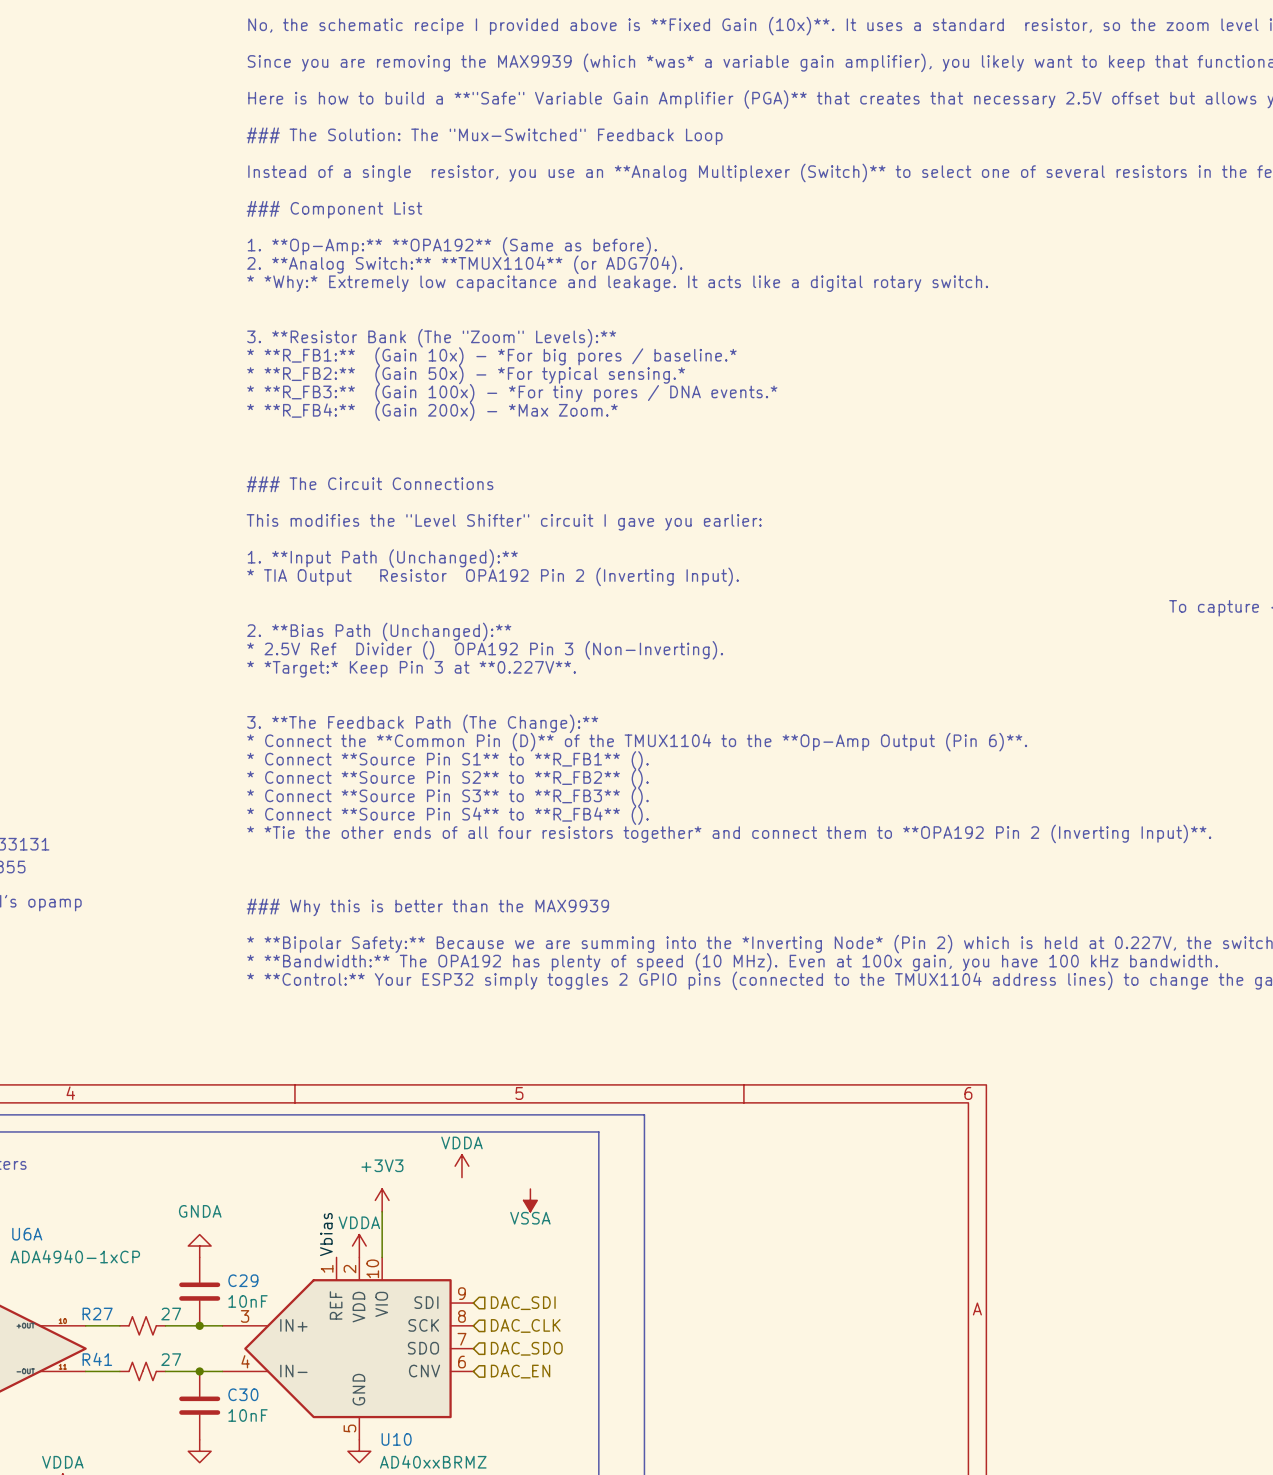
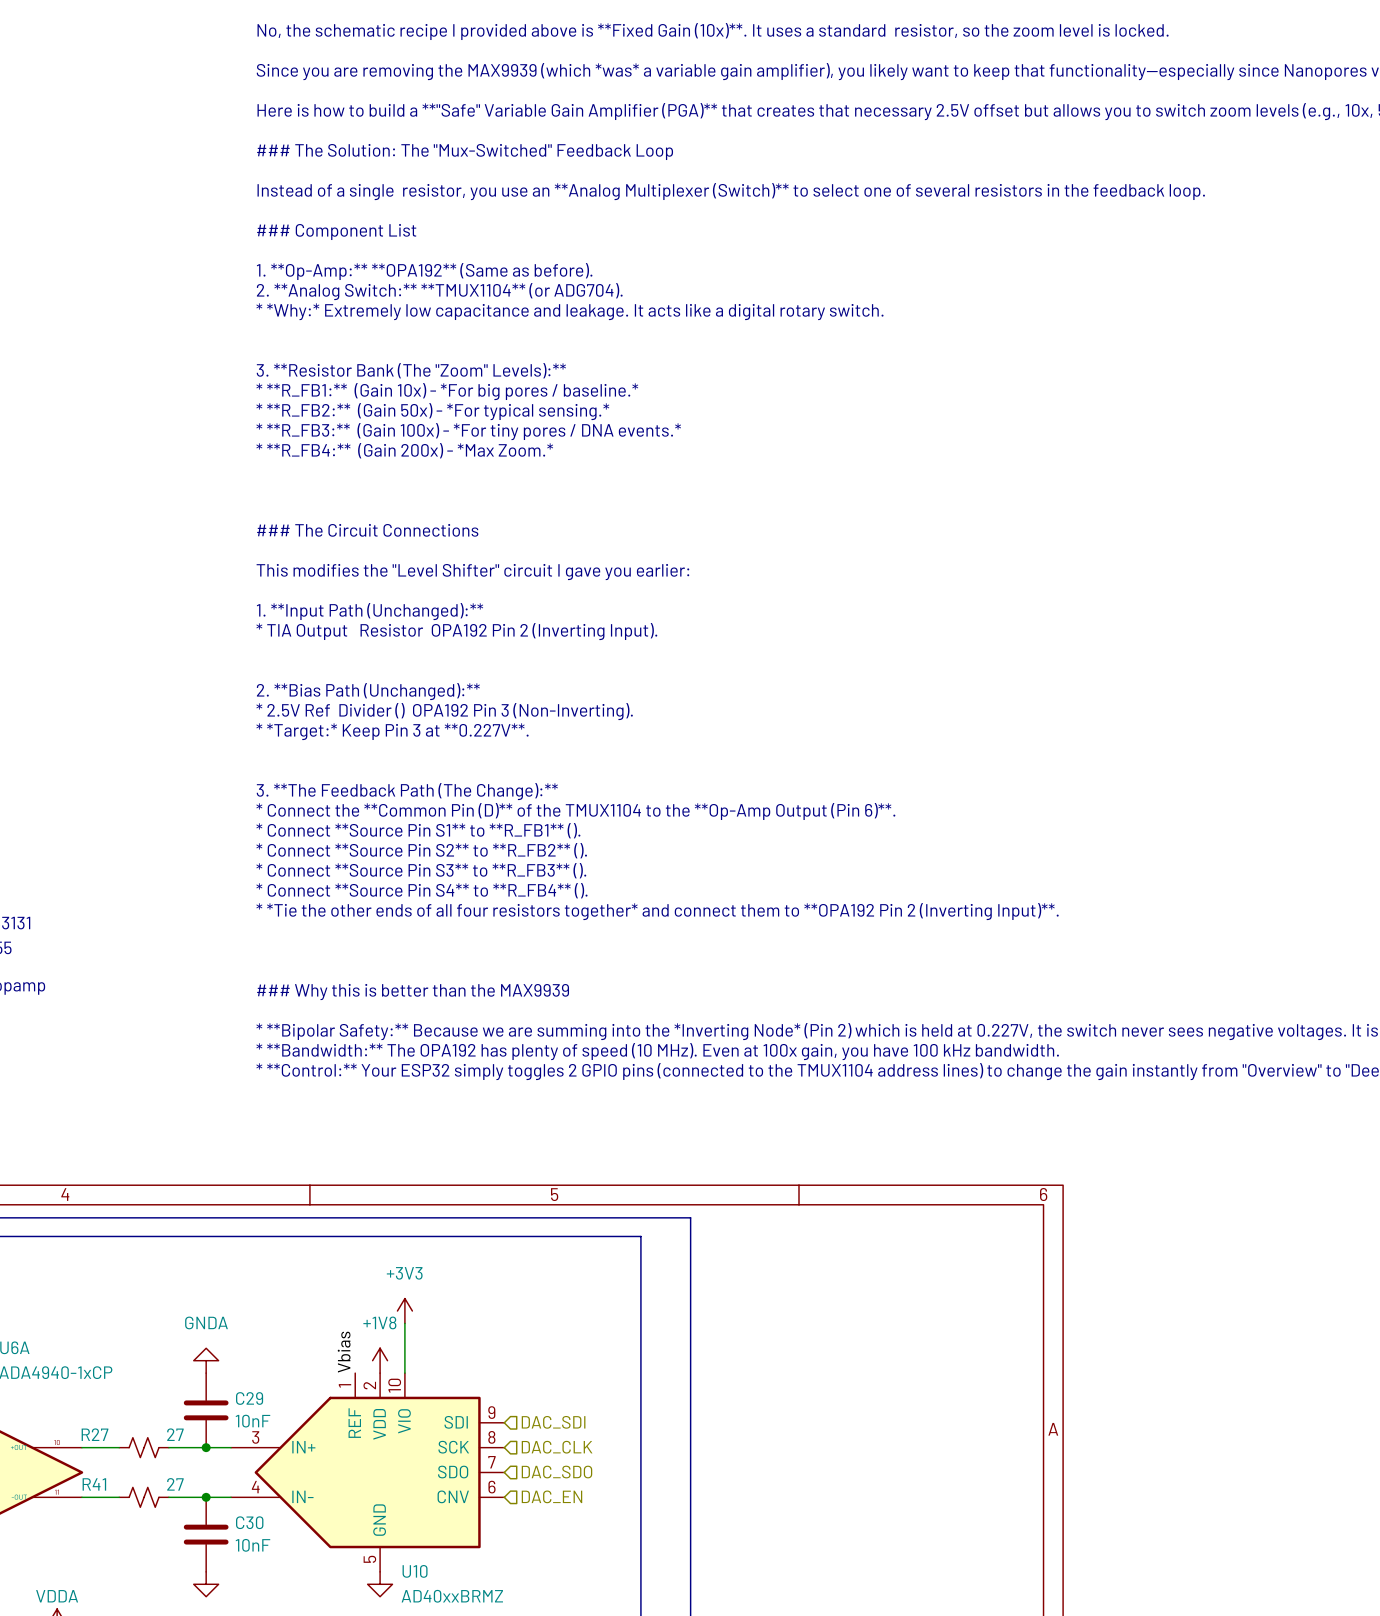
power symbol: VDDA (461, 1166) -> none
power symbol: VSSA (530, 1200) -> none
power symbol: VDDA (359, 1246) -> +1V8 (380, 1360)

